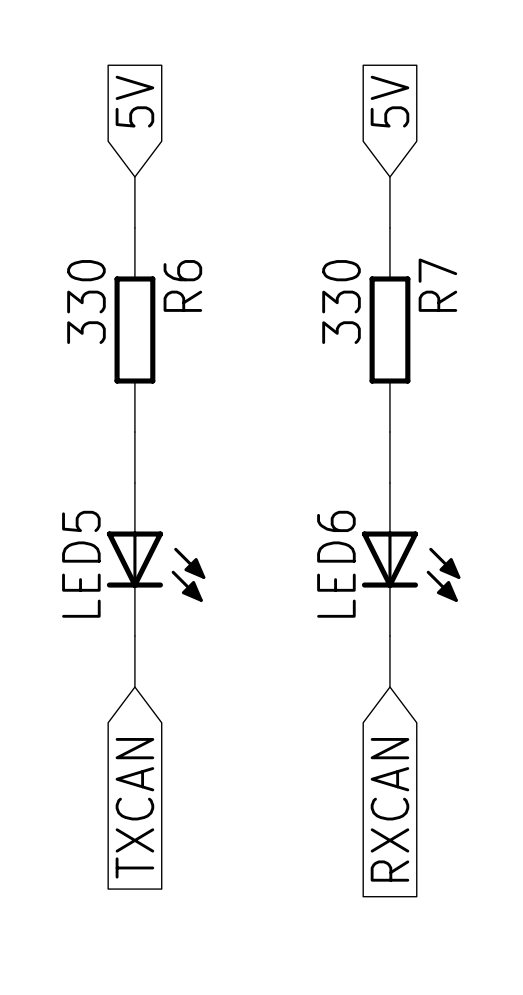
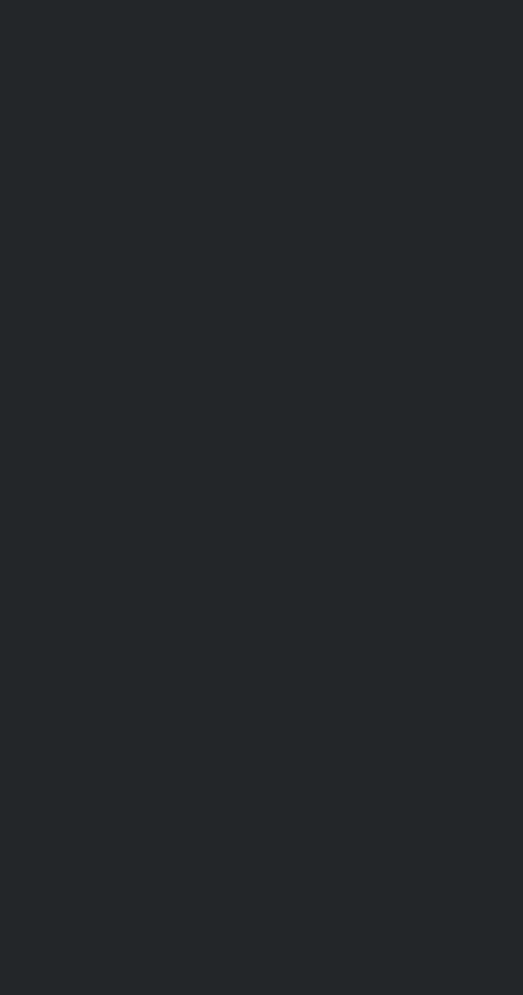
global label: 5V (134, 101) -> none
global label: 5V (389, 101) -> none
wire: (134, 176) (134, 227) -> none
wire: (389, 176) (389, 227) -> none
R6: 330 (134, 329) -> none
R7: 330 (389, 329) -> none
wire: (134, 432) (134, 483) -> none
wire: (389, 432) (389, 483) -> none
LED5: (156, 559) -> none
LED6: (411, 559) -> none
wire: (134, 636) (134, 687) -> none
wire: (389, 636) (389, 687) -> none
global label: TXCAN (134, 808) -> none
global label: RXCAN (389, 809) -> none

